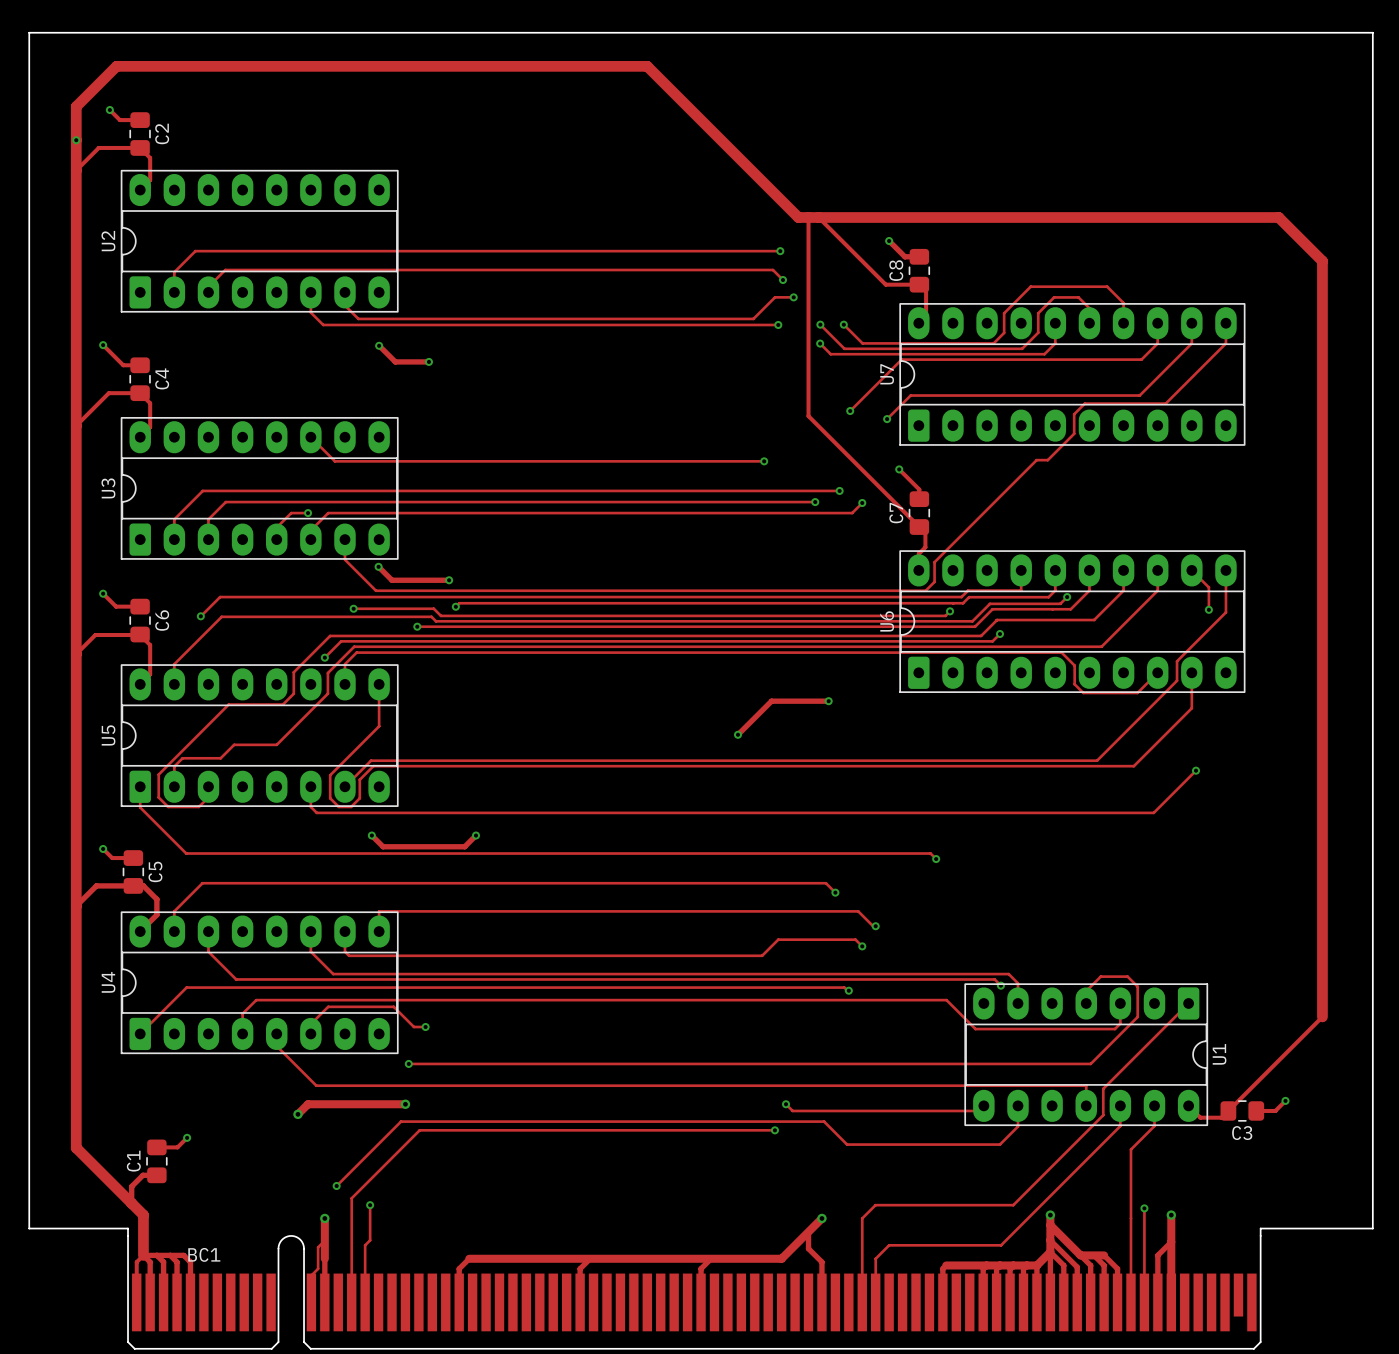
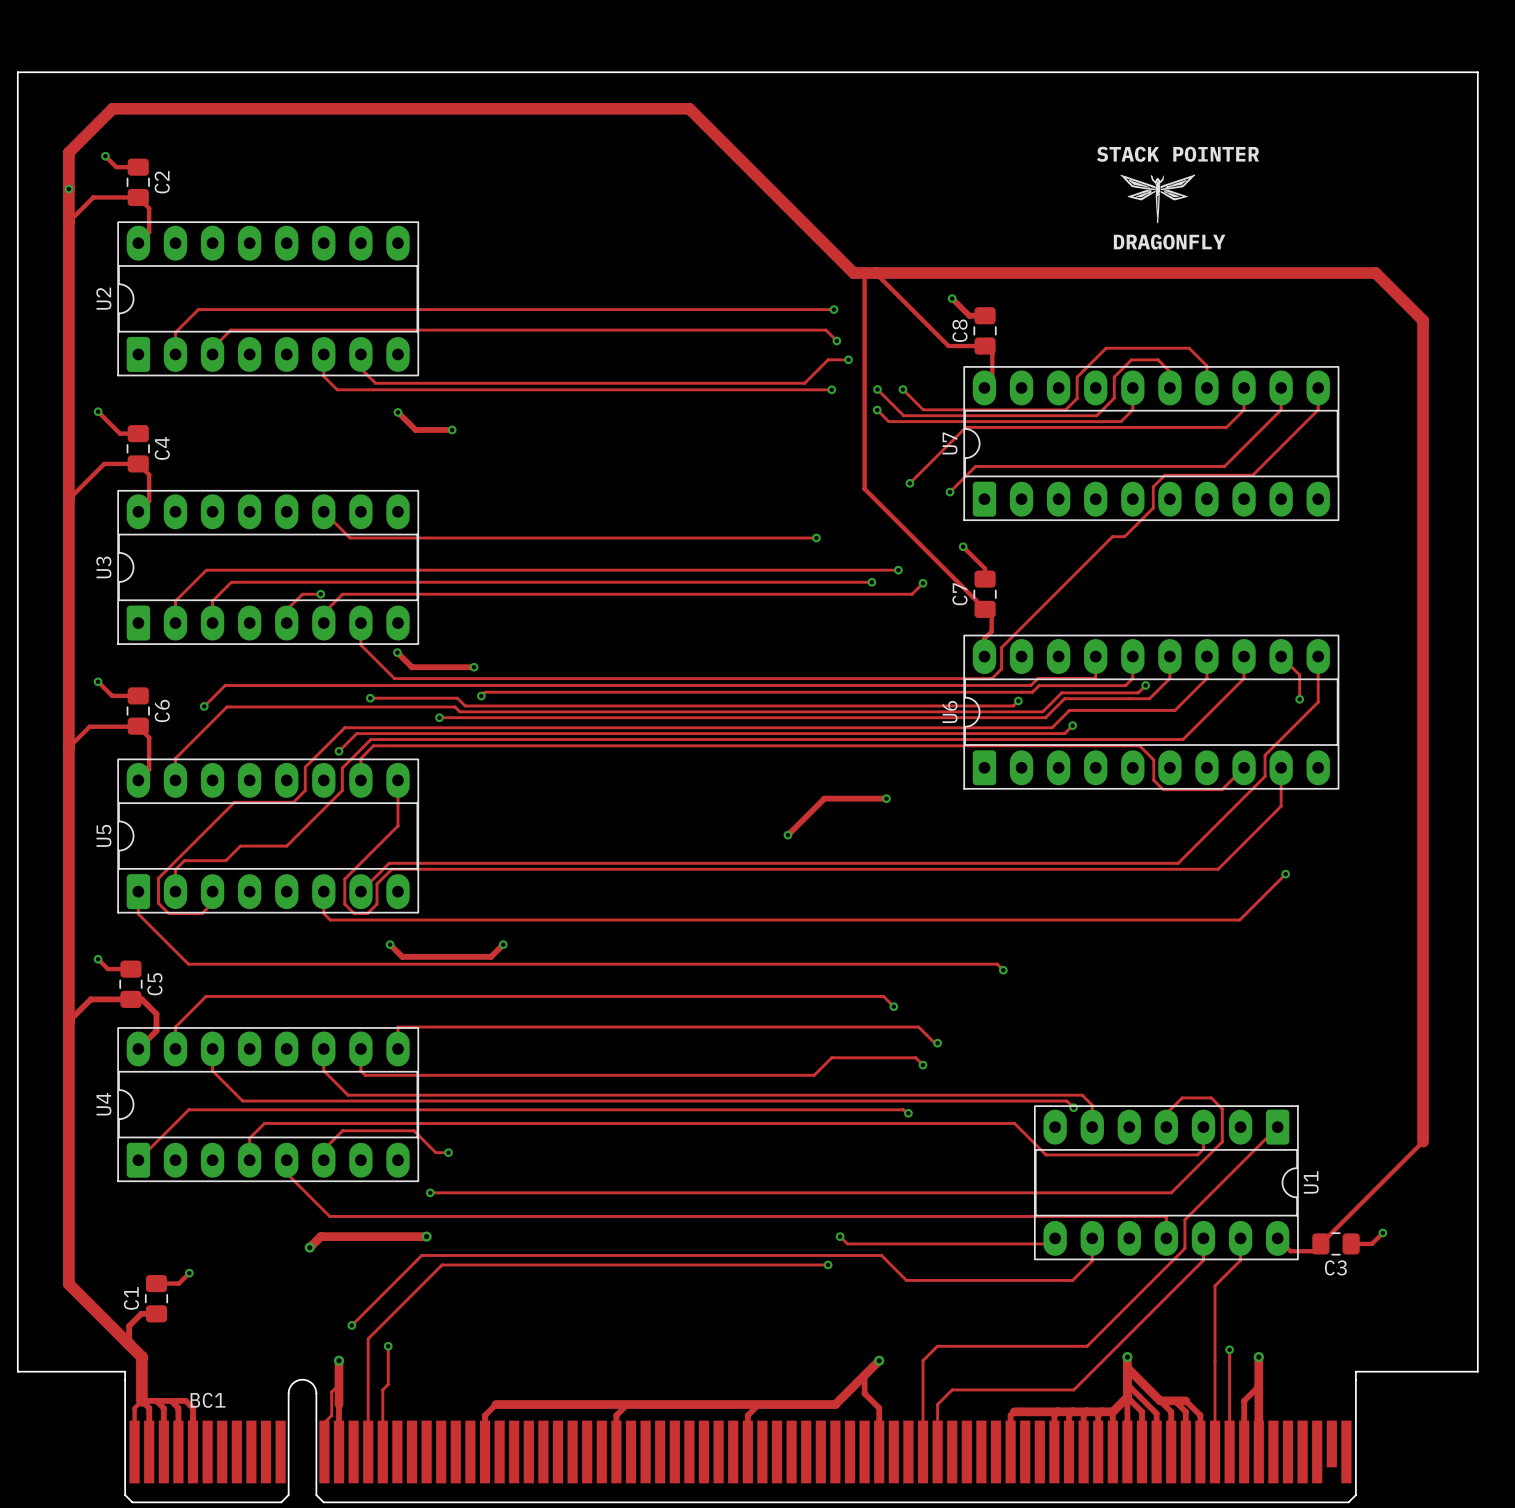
text: none -> STACK POINTER (1178, 154)
drawing: none -> [1120, 174, 1196, 224]
text: none -> DRAGONFLY (1169, 242)

